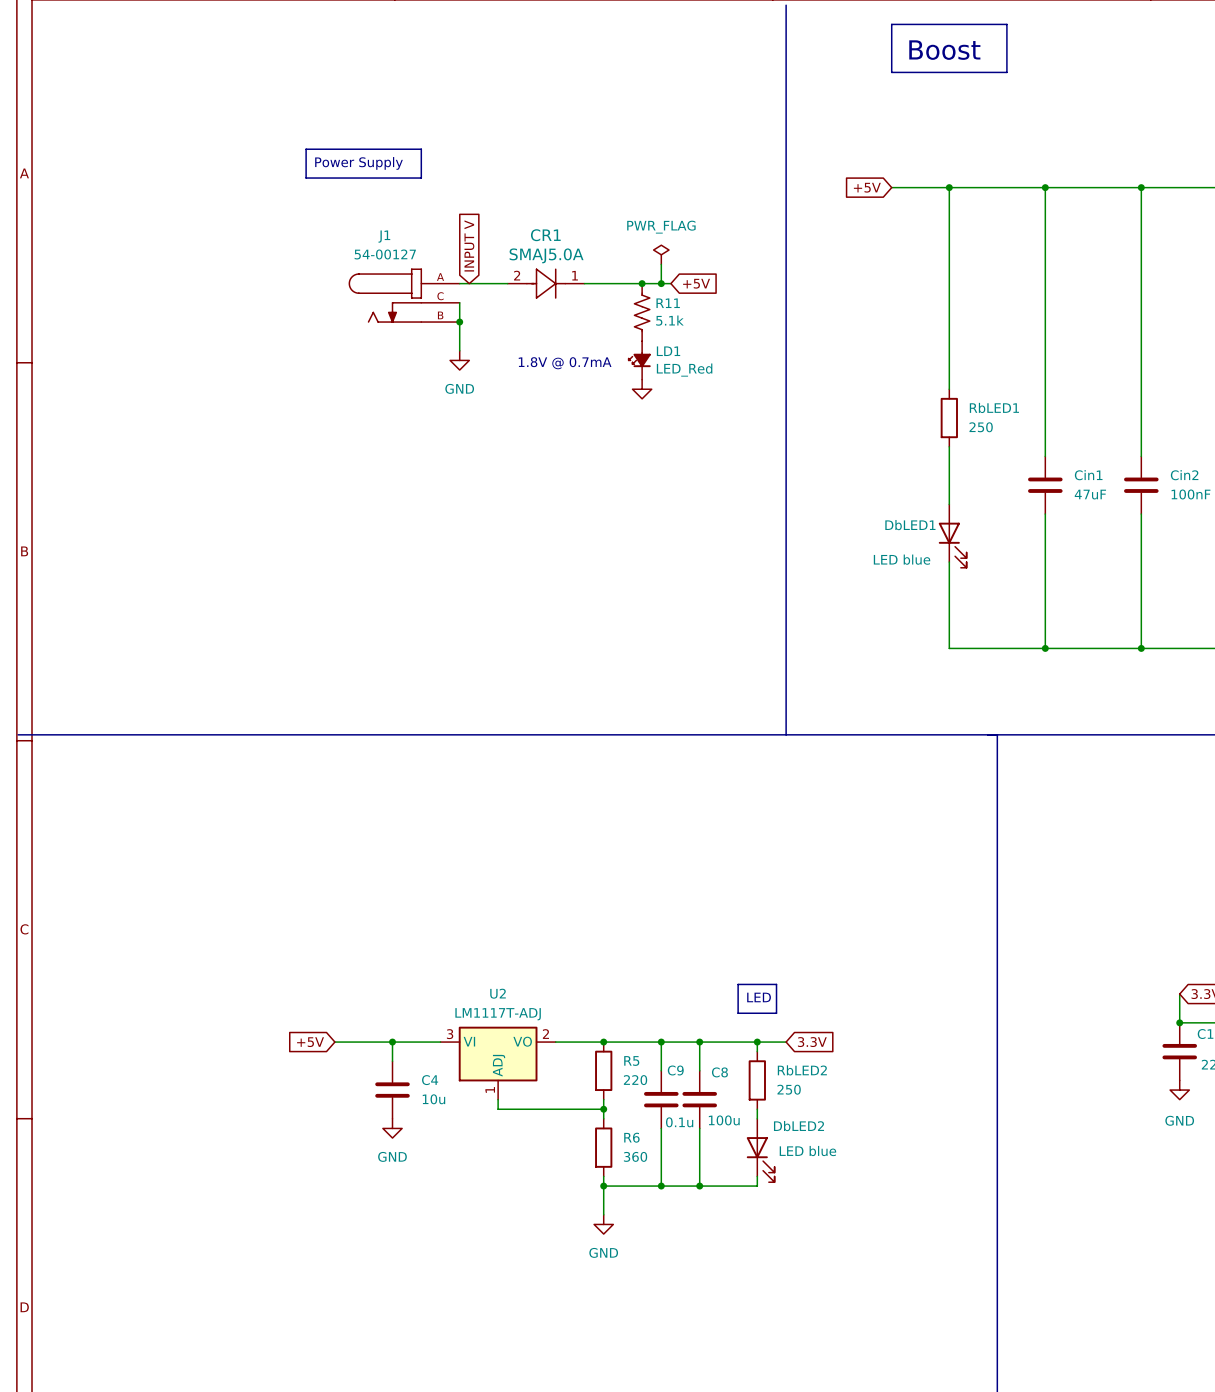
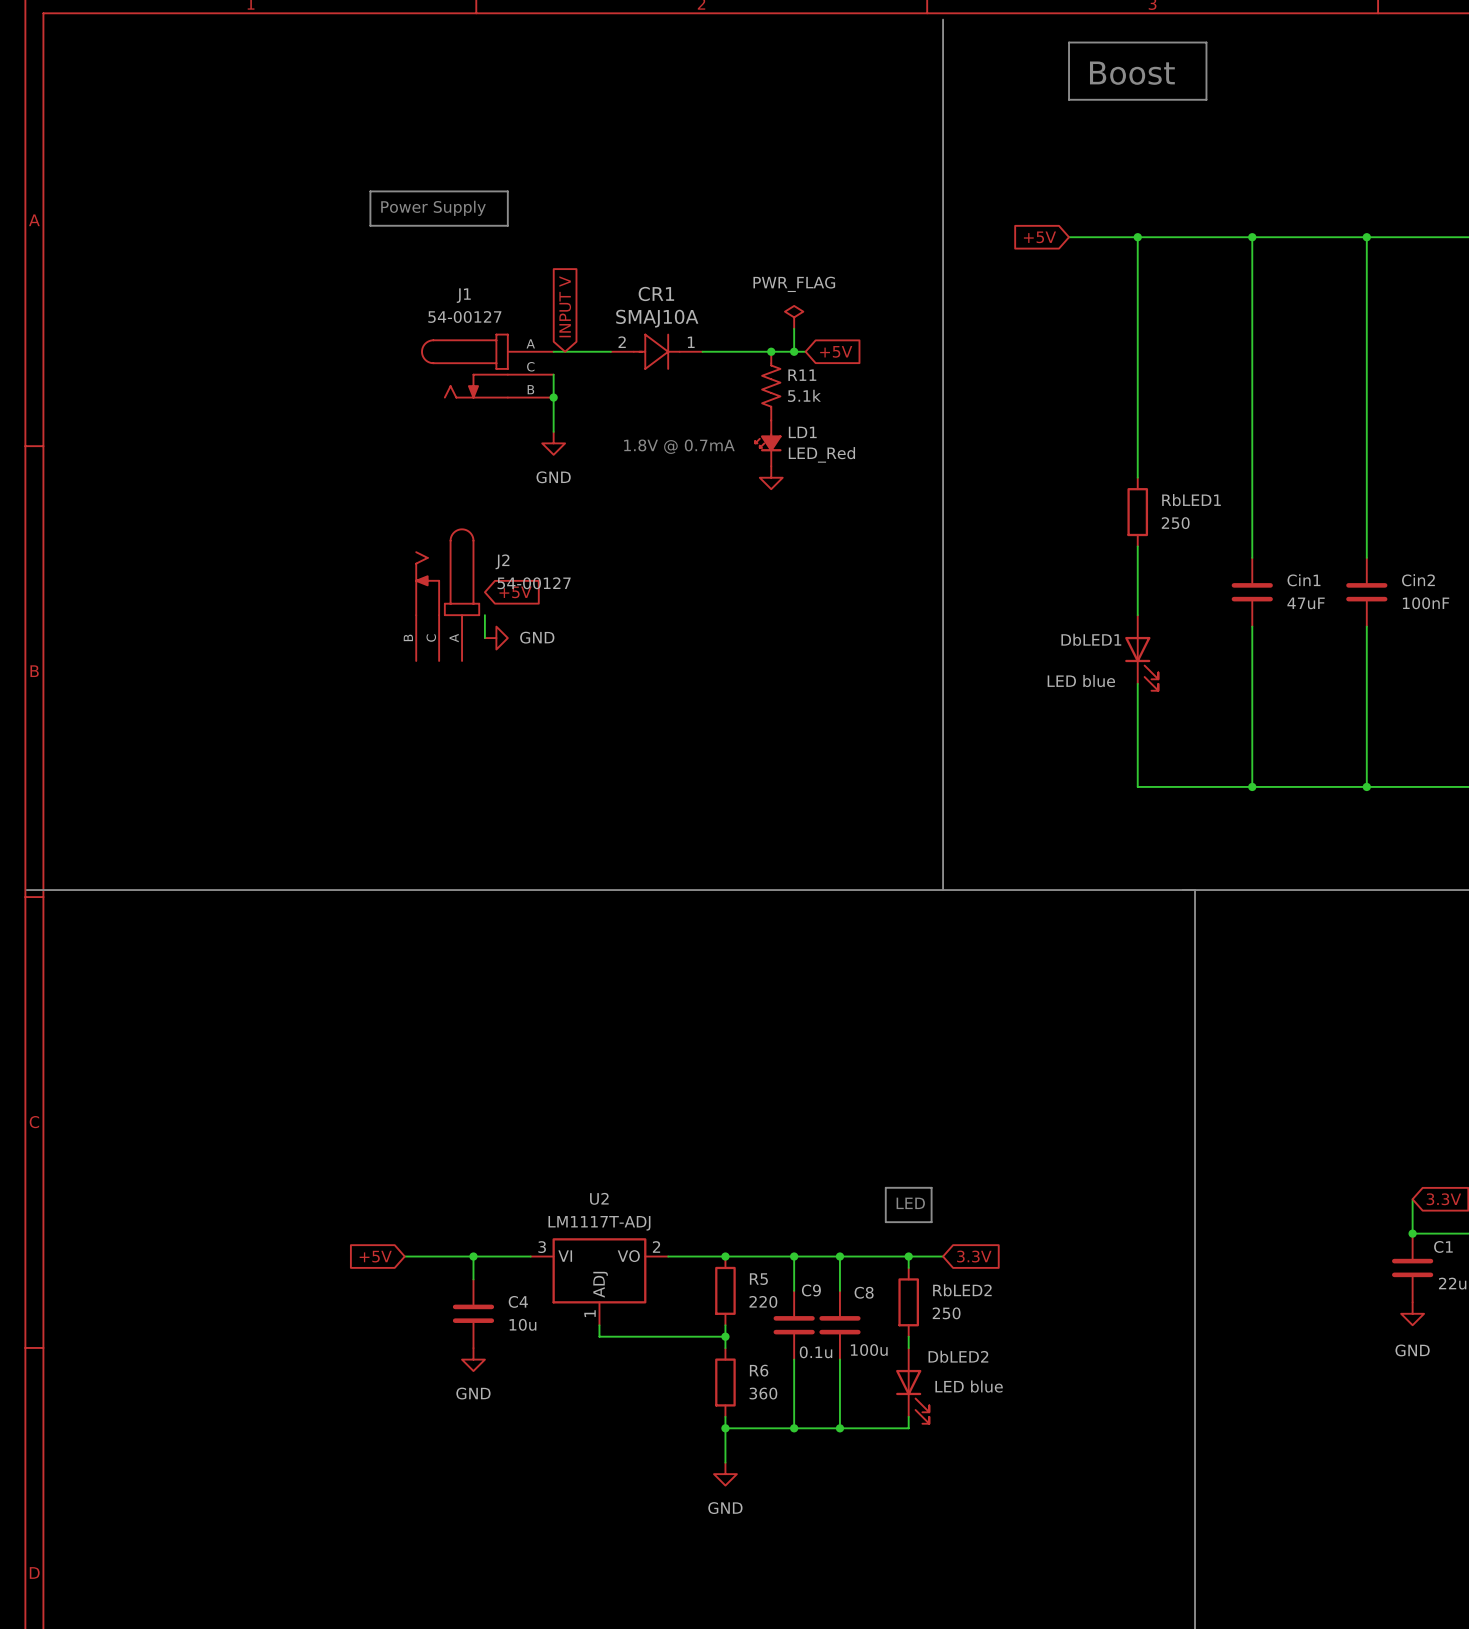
CR1 value: SMAJ5.0A (546, 255) -> SMAJ10A (657, 318)
global label: none -> +5V (515, 592)
J2: none -> 54-00127 (447, 594)
wire: none -> (484, 615) (484, 638)
power symbol: none -> GND (496, 638)

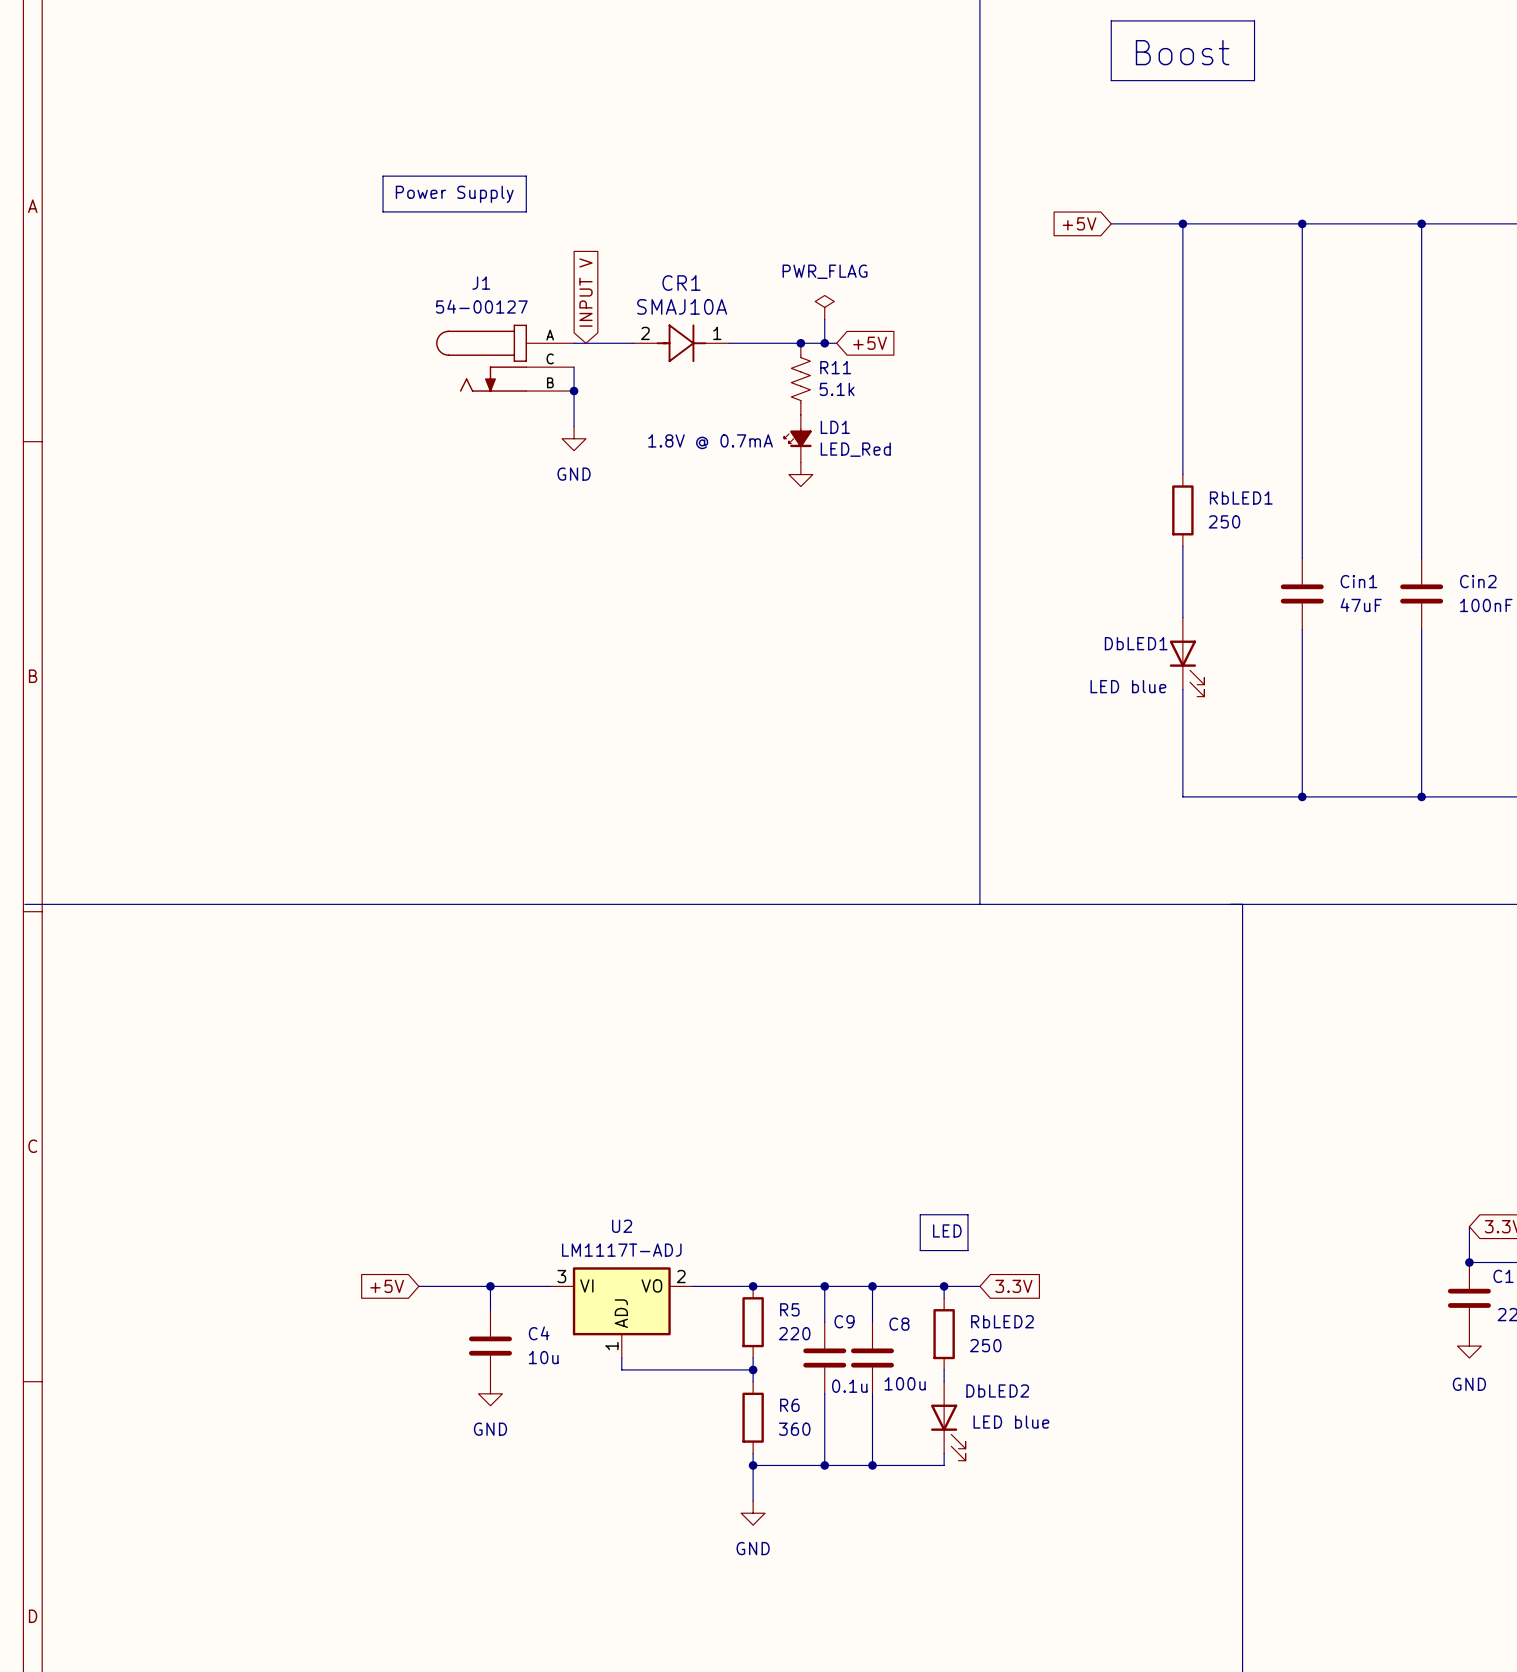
global label: +5V (515, 592) -> none
J2: 54-00127 (447, 594) -> none
wire: (484, 615) (484, 638) -> none
power symbol: GND (496, 638) -> none

